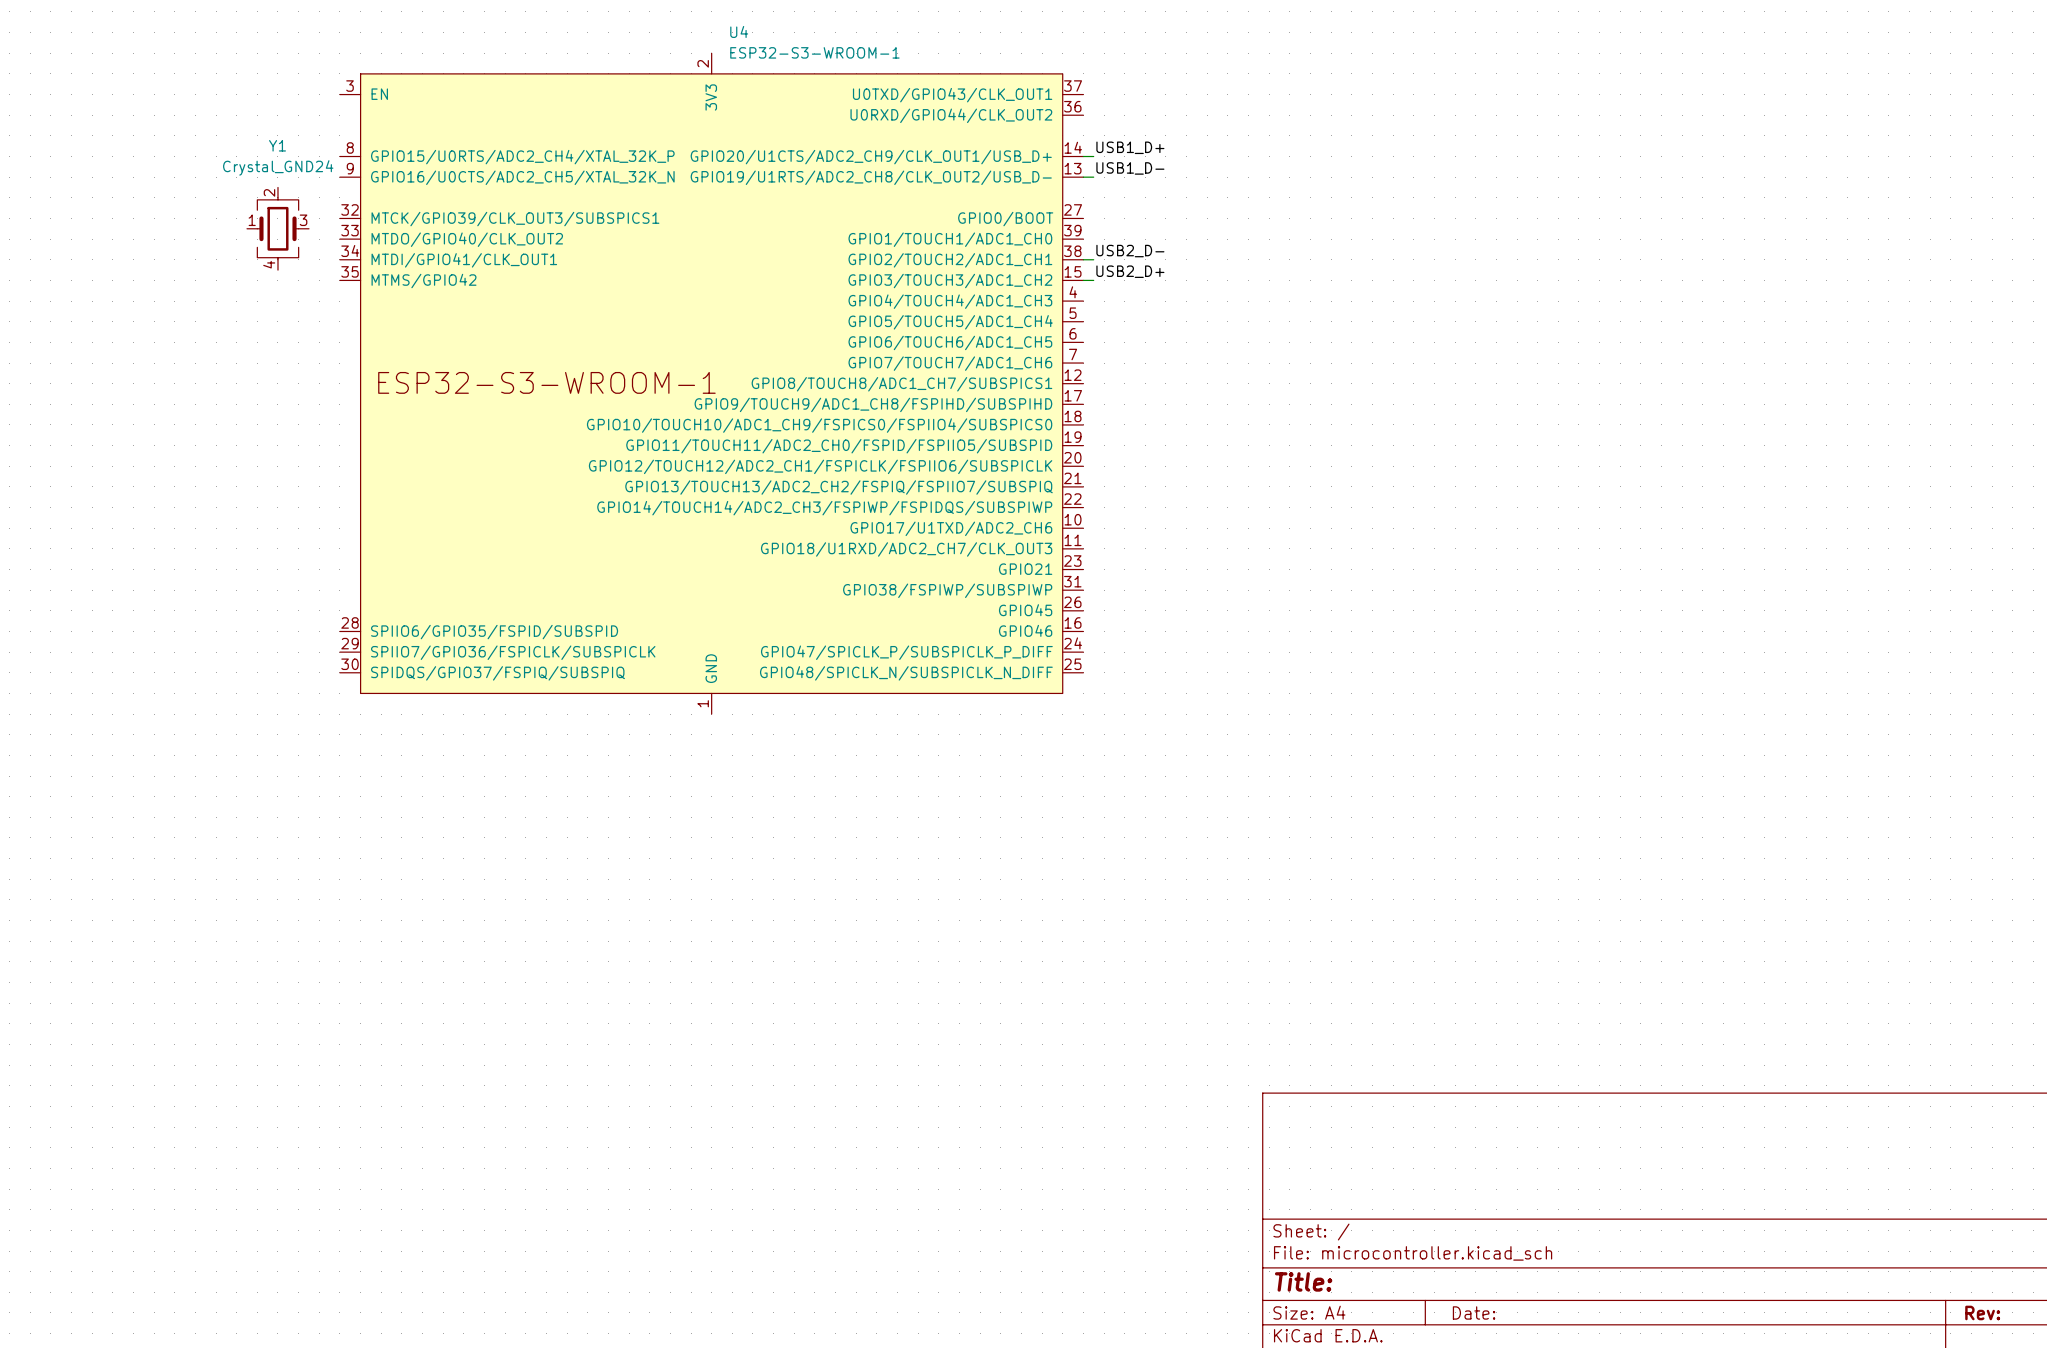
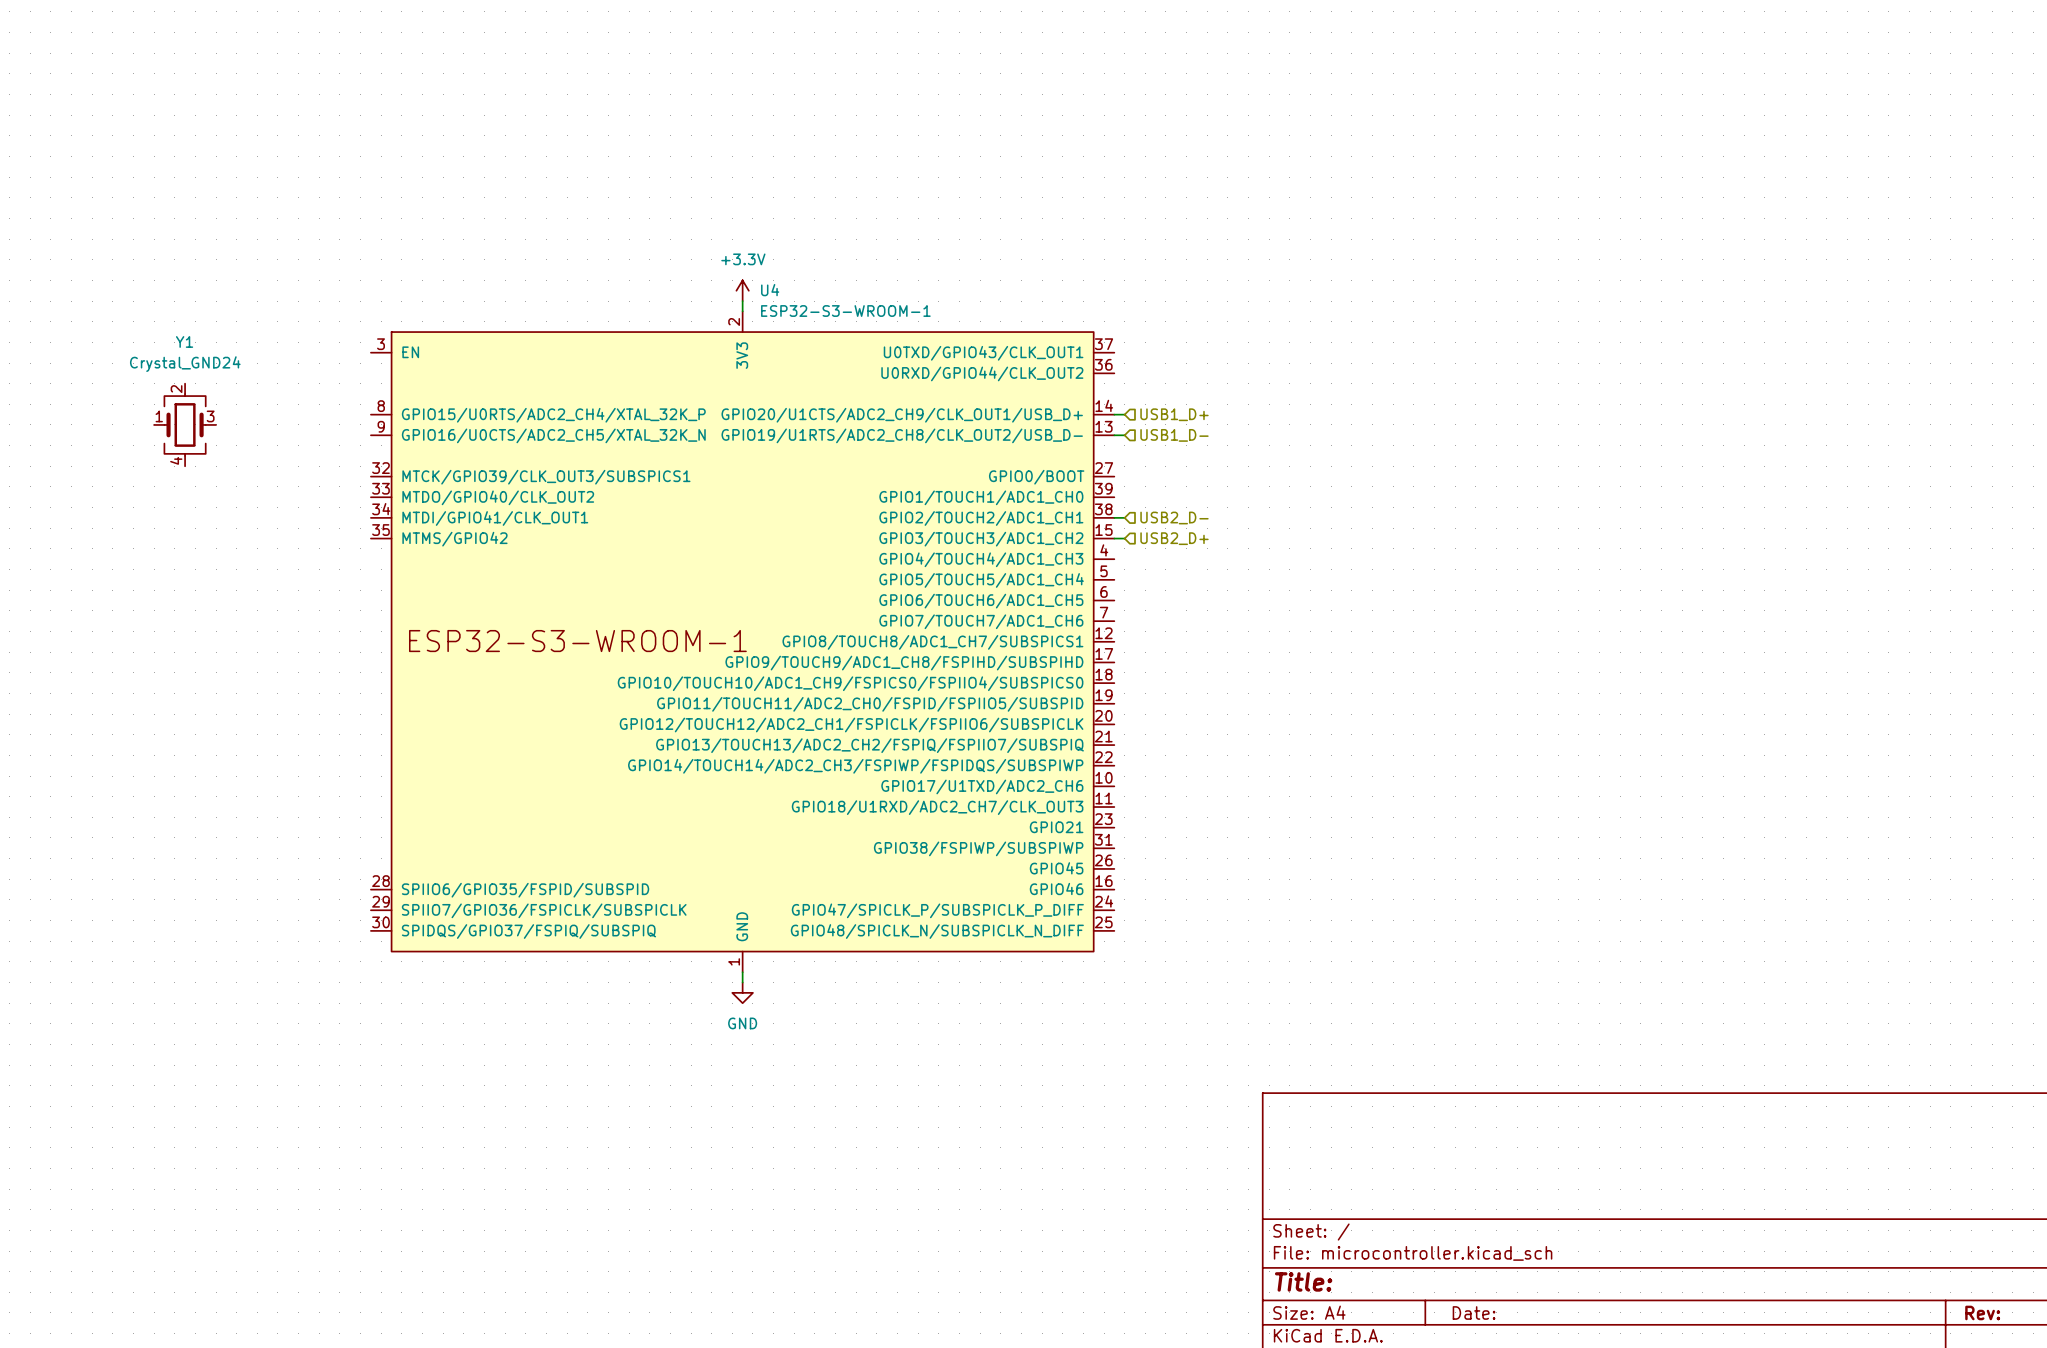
label: USB1_D+ (1130, 147) -> none
wire: (1083, 156) (1093, 156) -> none
label: USB1_D- (1130, 168) -> none
wire: (1083, 177) (1093, 177) -> none
Y1 position: (277, 228) -> (185, 424)
label: USB2_D- (1130, 251) -> none
wire: (1083, 259) (1093, 259) -> (1114, 414) (1124, 414)
label: USB2_D+ (1130, 271) -> none
wire: (1083, 280) (1093, 280) -> (1114, 435) (1124, 435)
power symbol: none -> +3.3V (742, 290)
U4 position: (711, 383) -> (742, 641)
hierarchical label: none -> USB1_D+ (1174, 414)
hierarchical label: none -> USB1_D- (1174, 435)
wire: none -> (1114, 517) (1124, 517)
hierarchical label: none -> USB2_D- (1174, 518)
wire: none -> (1114, 538) (1124, 538)
hierarchical label: none -> USB2_D+ (1174, 538)
wire: none -> (742, 972) (742, 982)
power symbol: none -> GND (742, 992)

